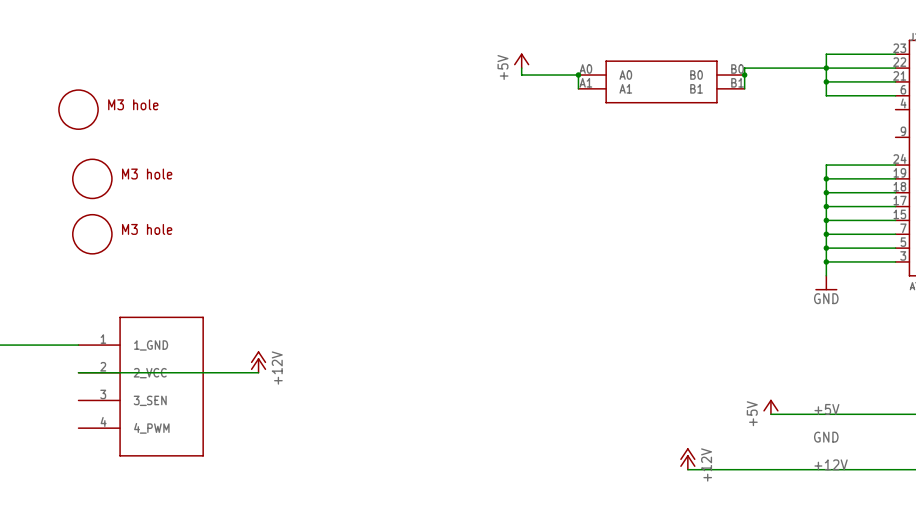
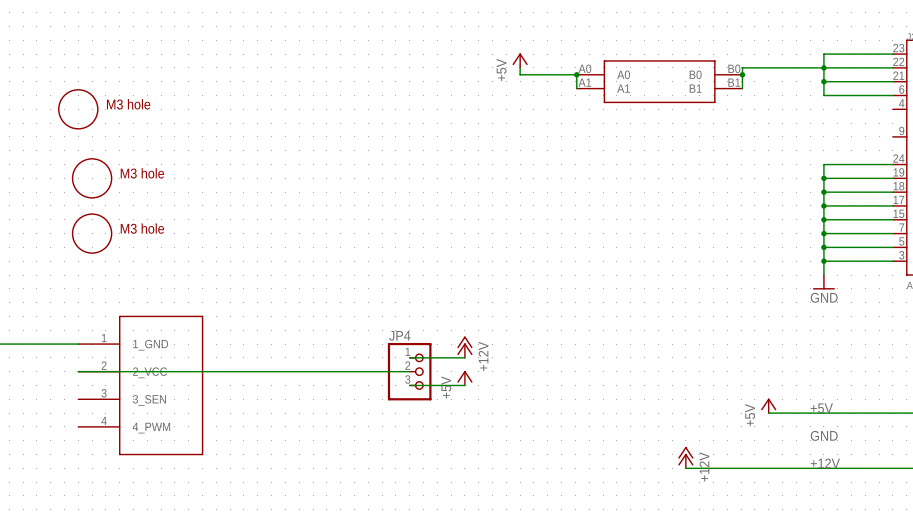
power symbol: none -> +12V (464, 347)
wire: none -> (409, 357) (464, 357)
power symbol: +12V (258, 362) -> none
wire: none -> (257, 371) (409, 371)
JP4: none -> (409, 371)
power symbol: none -> +5V (464, 378)
wire: none -> (409, 385) (464, 385)

